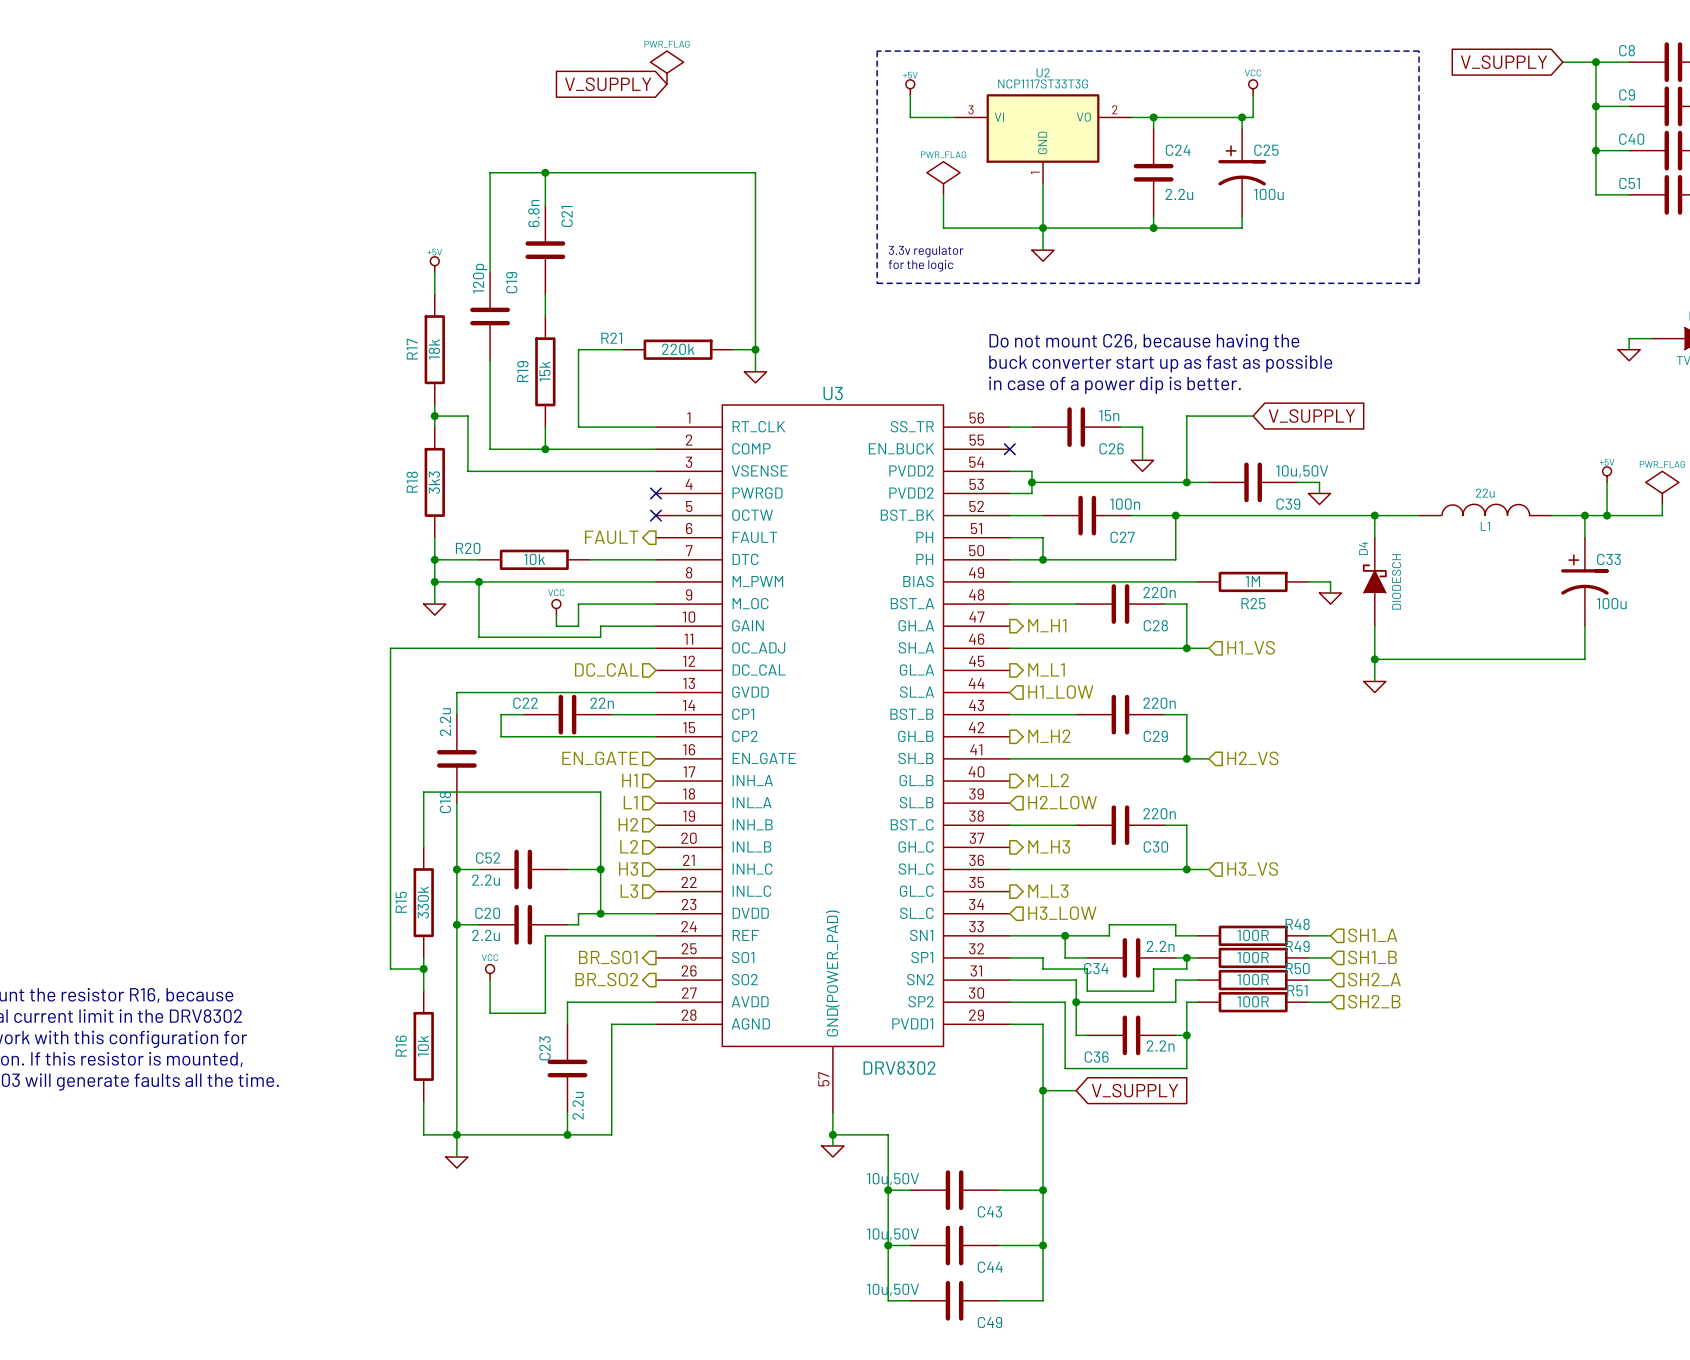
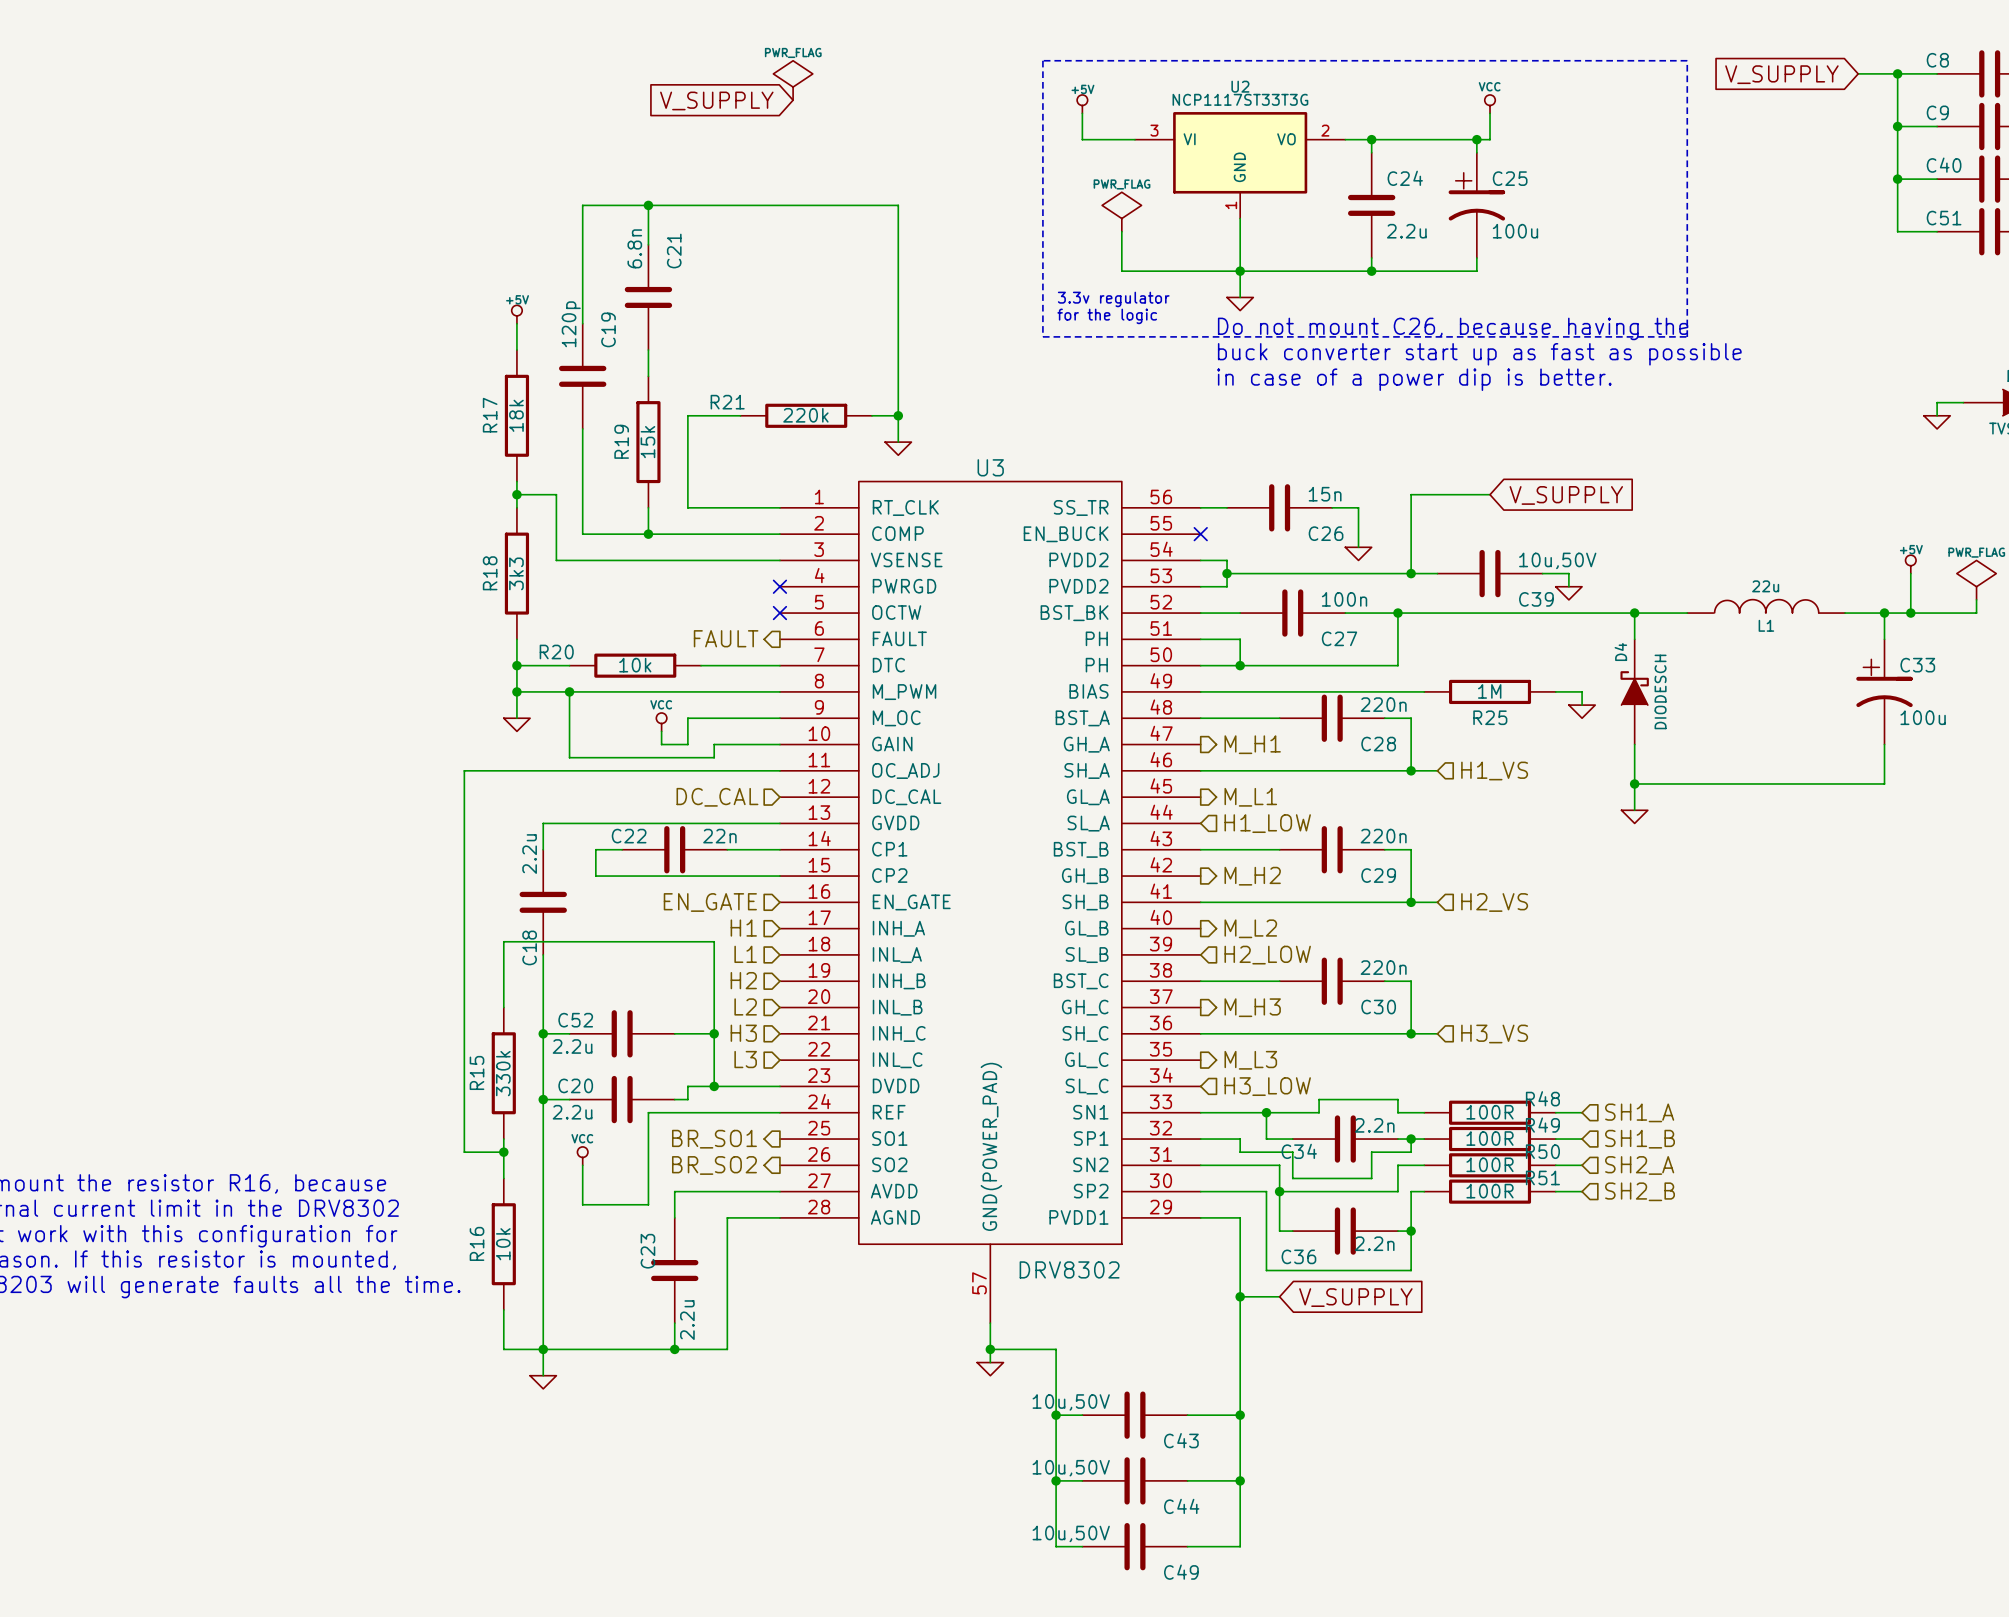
text position: Do not mount C26, because having the (1144, 342) -> Do not mount C26, because having the (1453, 328)
text position: buck converter start up as fast as possible (1160, 363) -> buck converter start up as fast as possible (1479, 354)
text position: in case of a power dip is better. (1114, 385) -> in case of a power dip is better. (1414, 379)

